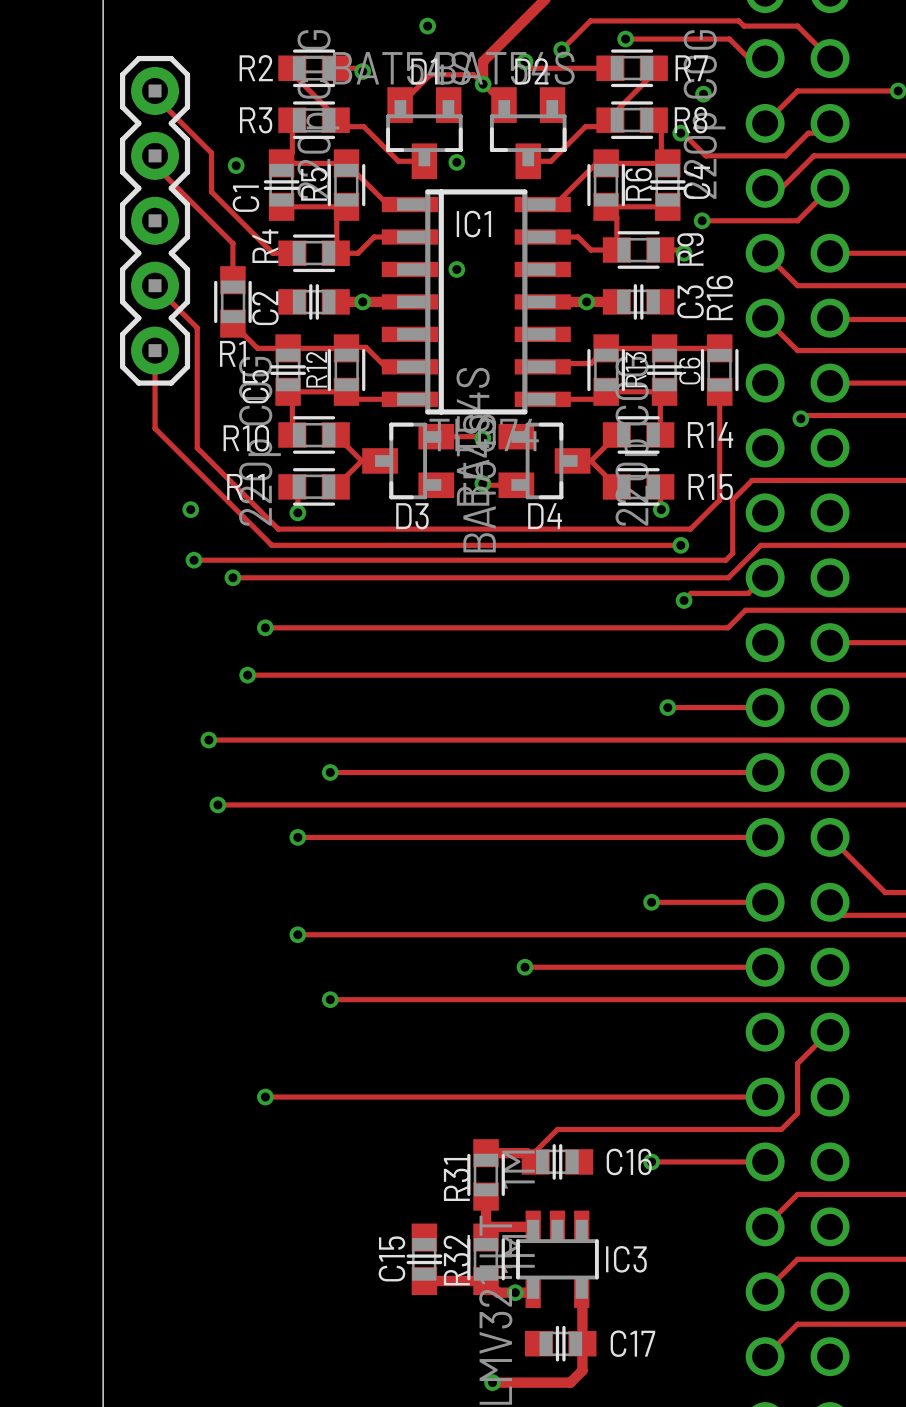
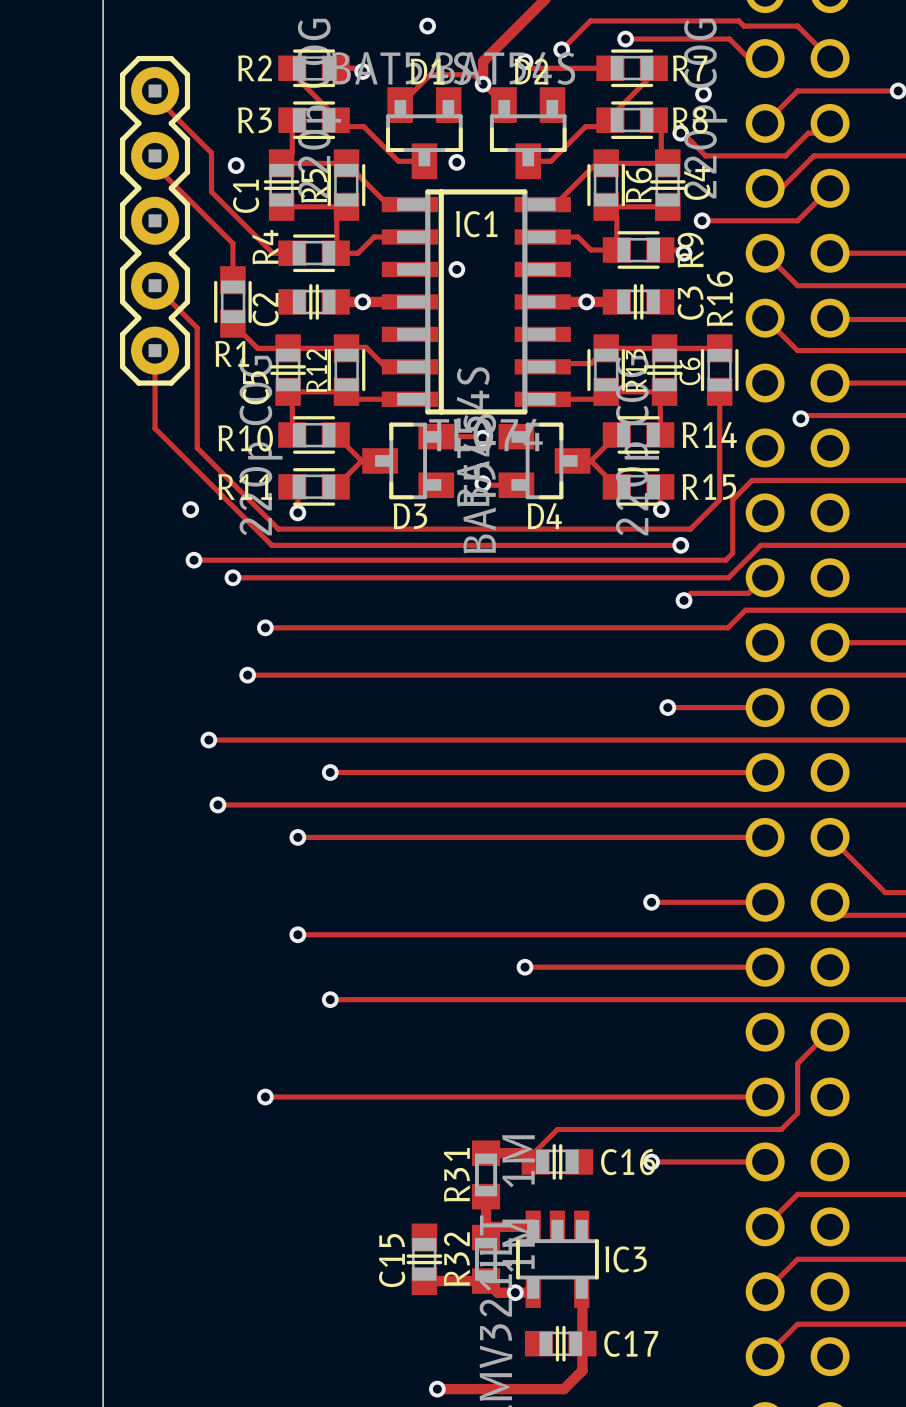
R31 footprint: [467, 1139, 505, 1211] -> [472, 1140, 501, 1210]
R32 footprint: [467, 1223, 505, 1296] -> [472, 1224, 501, 1294]
track: (492, 1382) (570, 1382) -> (437, 1389) (563, 1389) (570, 1382)
via position: (492, 1382) -> (437, 1389)

